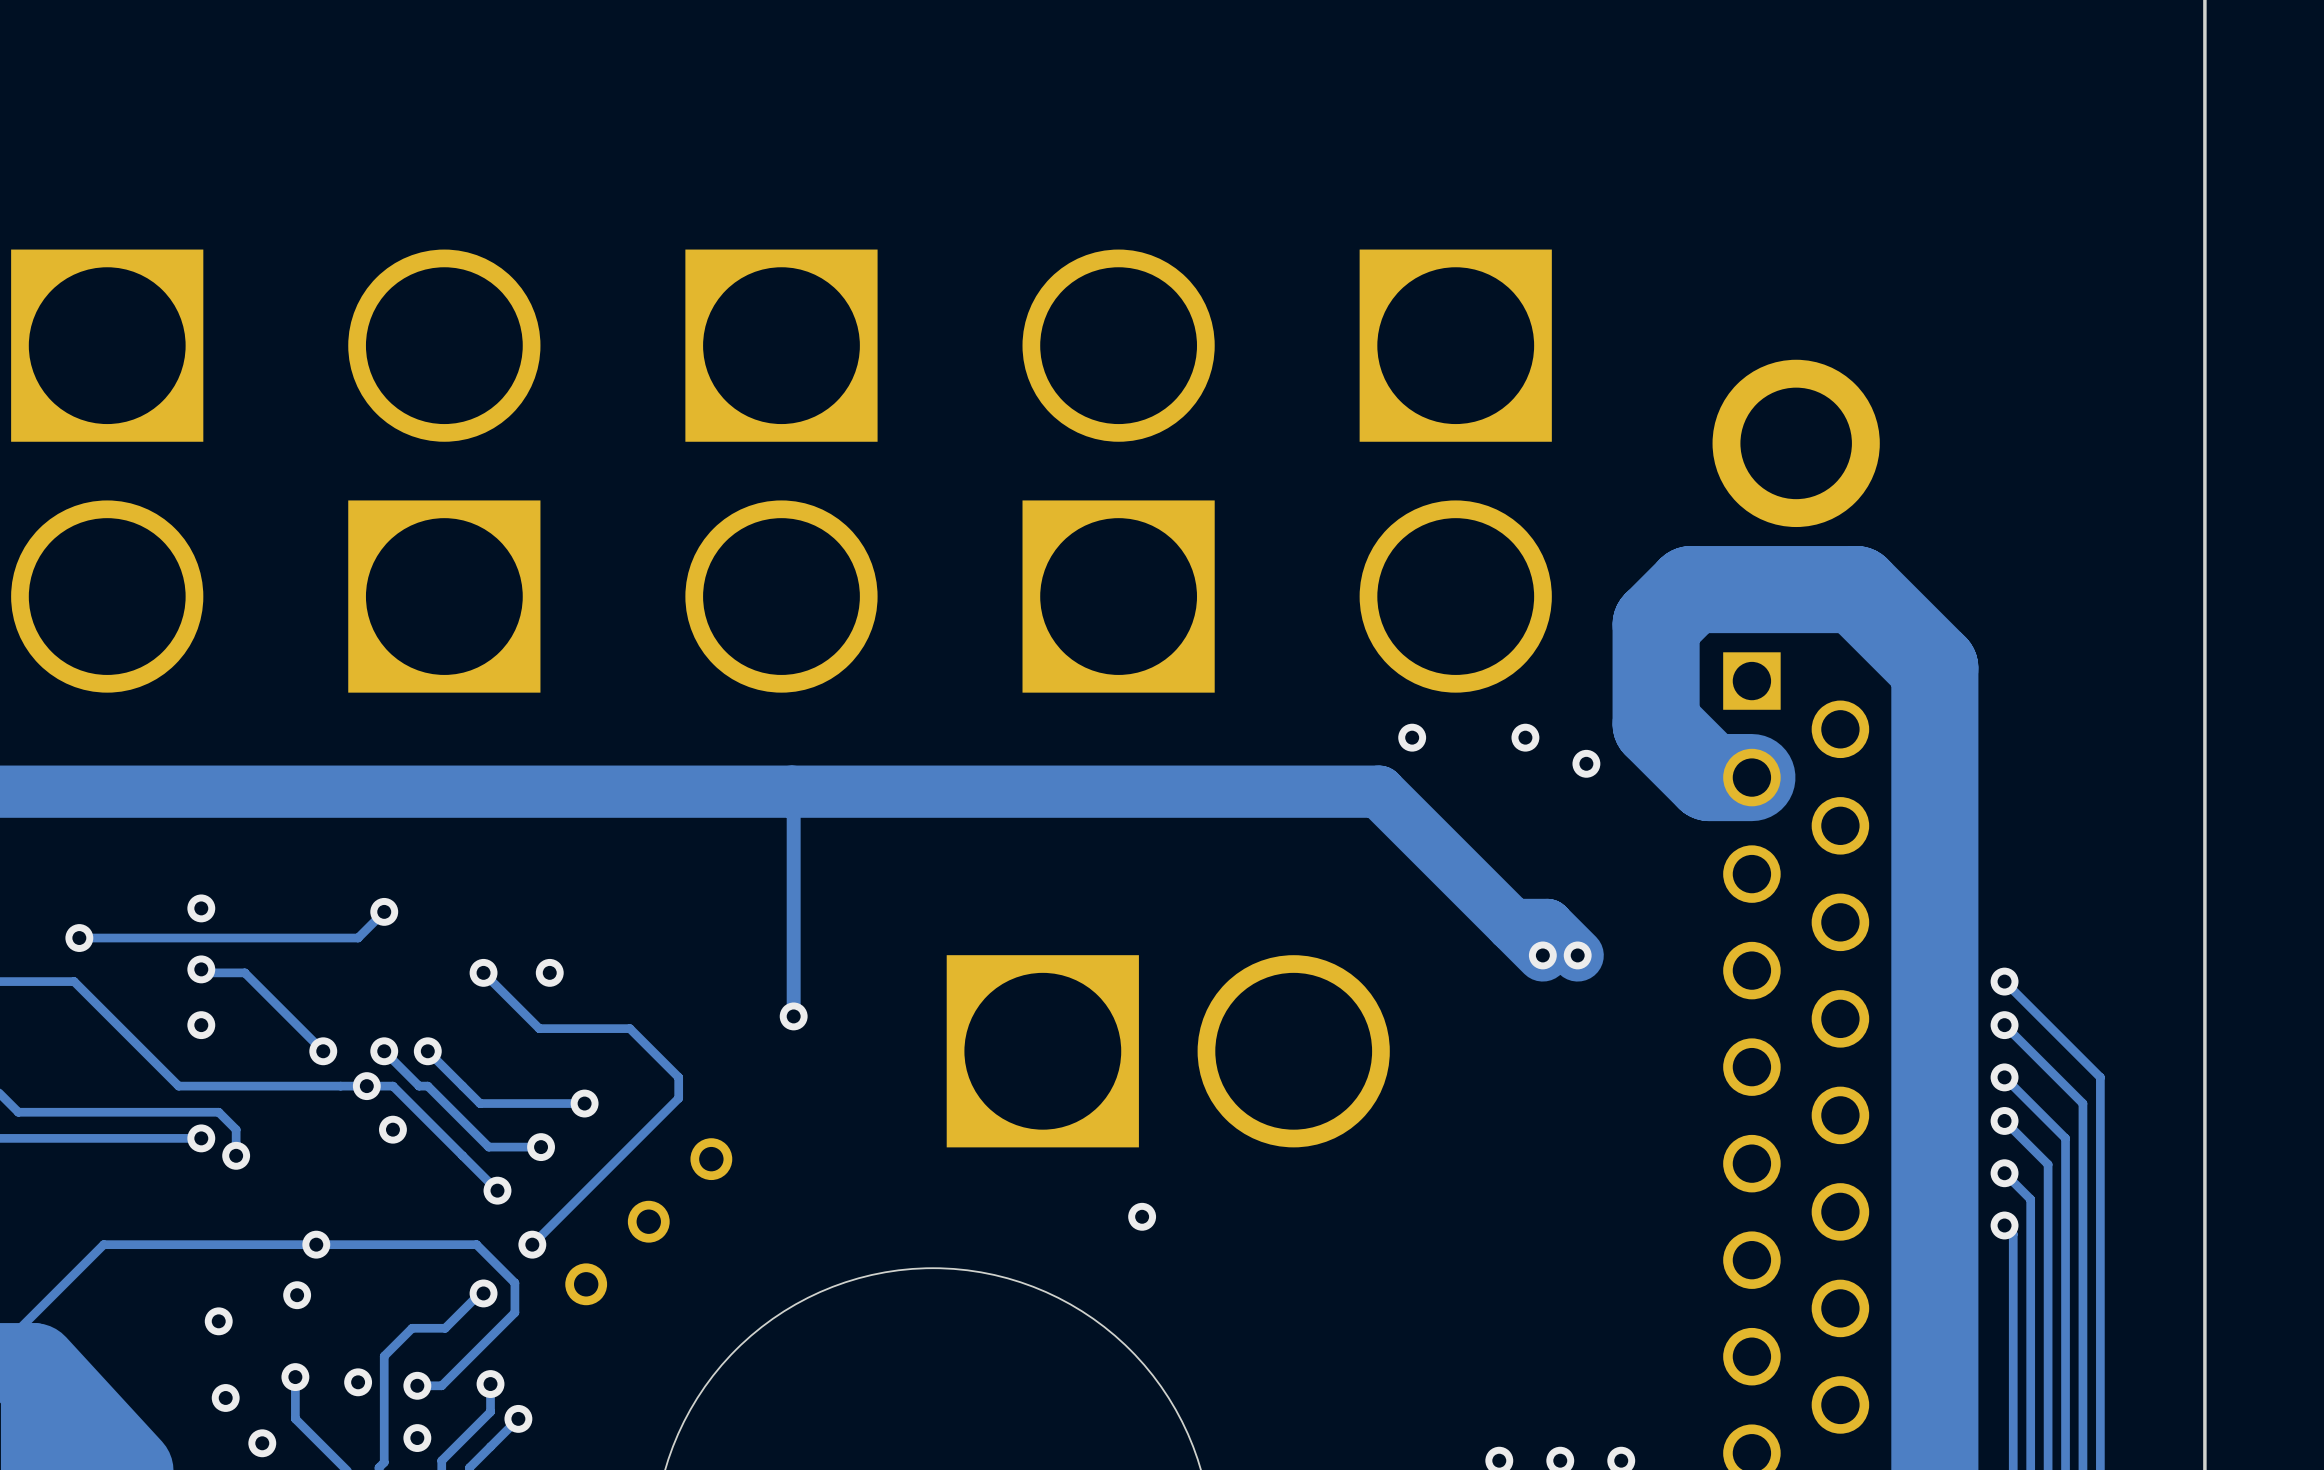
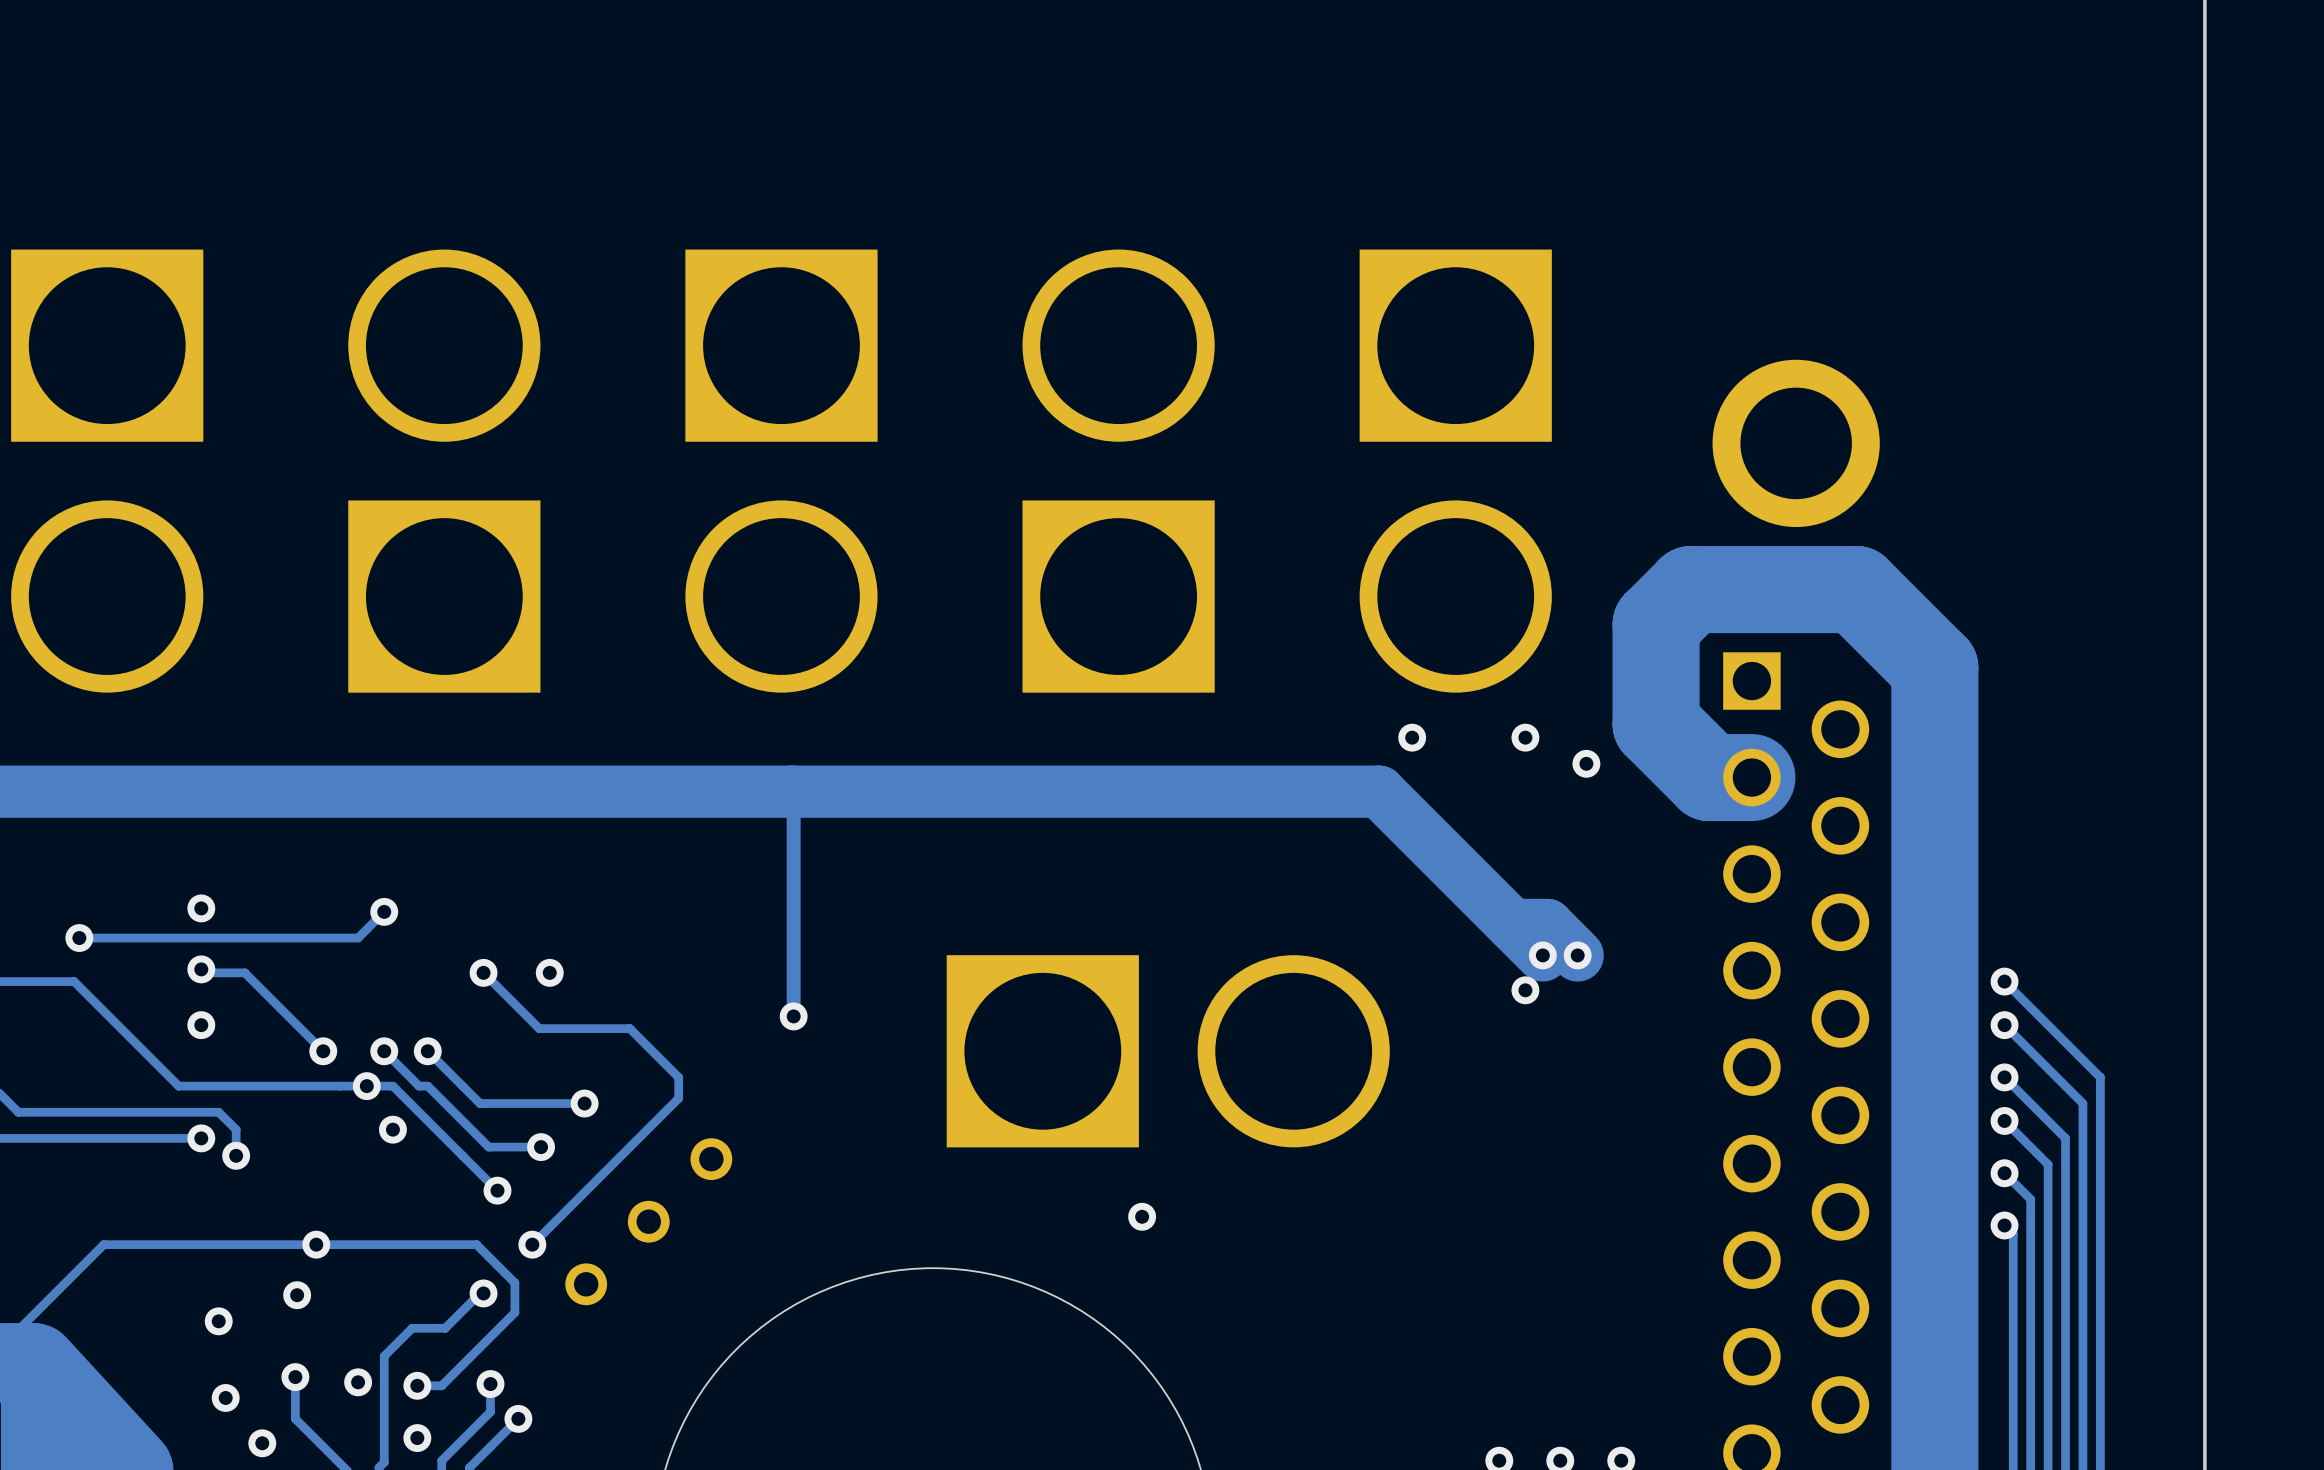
via: none -> (1525, 990)

